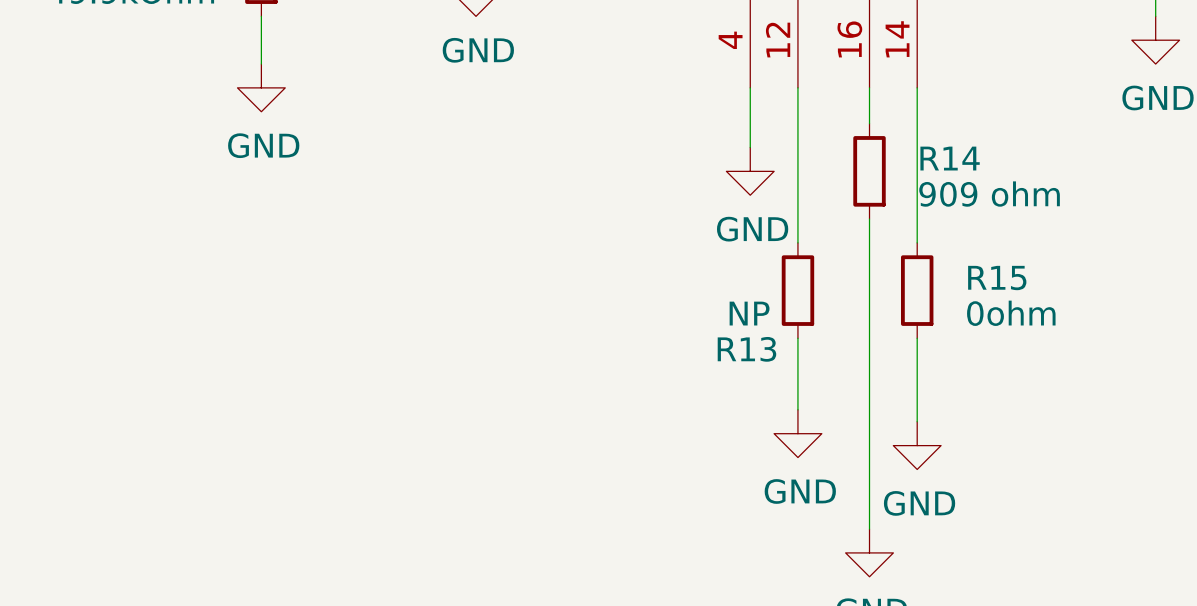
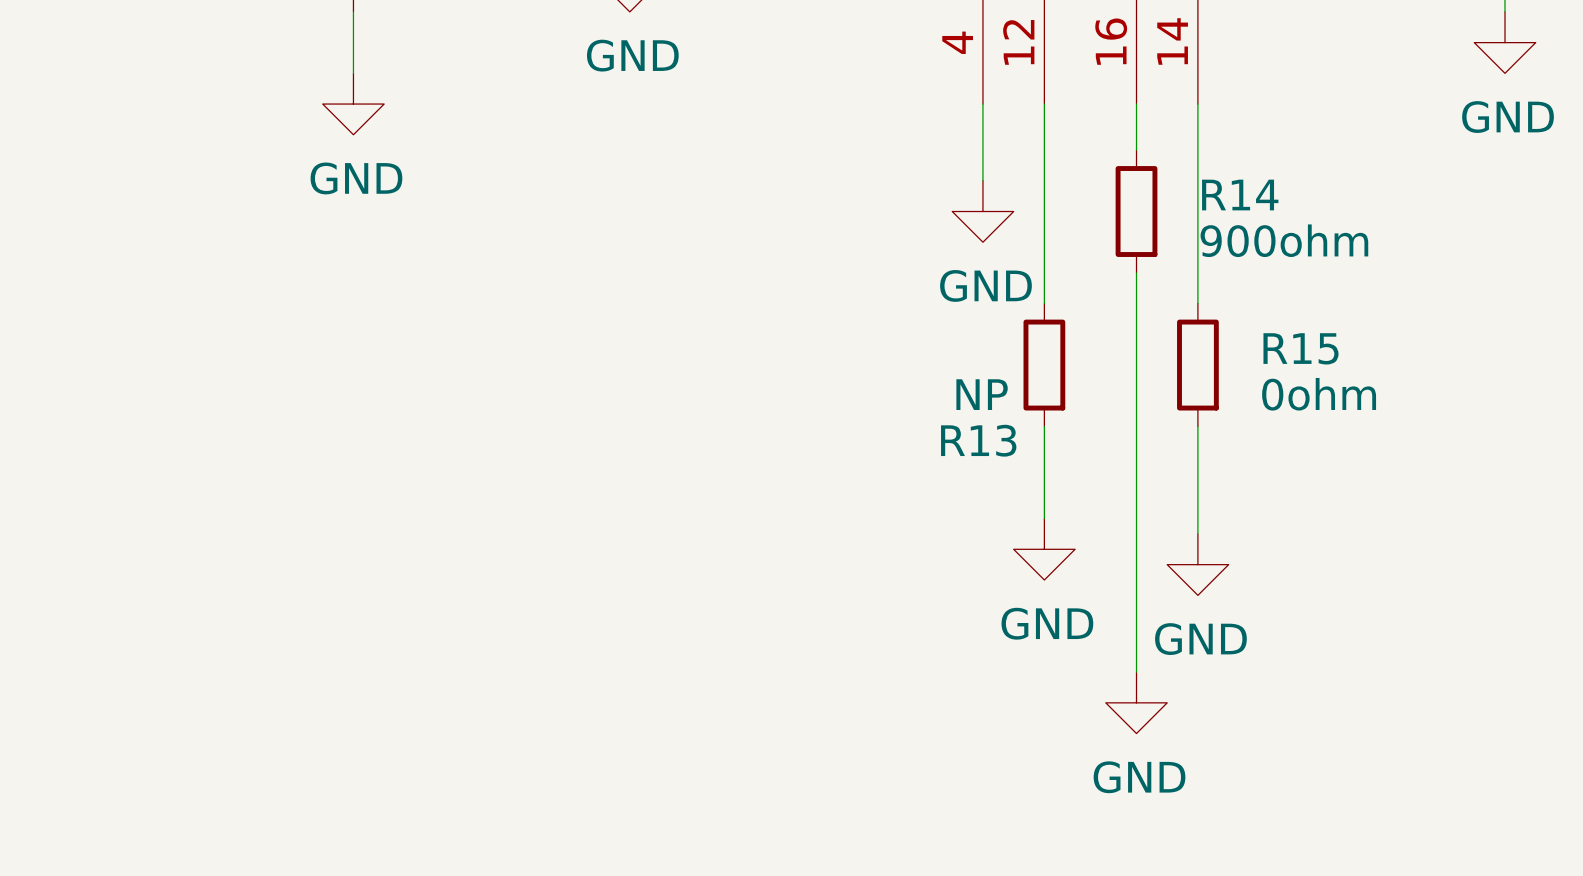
R14 value: 909 ohm (989, 194) -> 900ohm (1284, 240)

